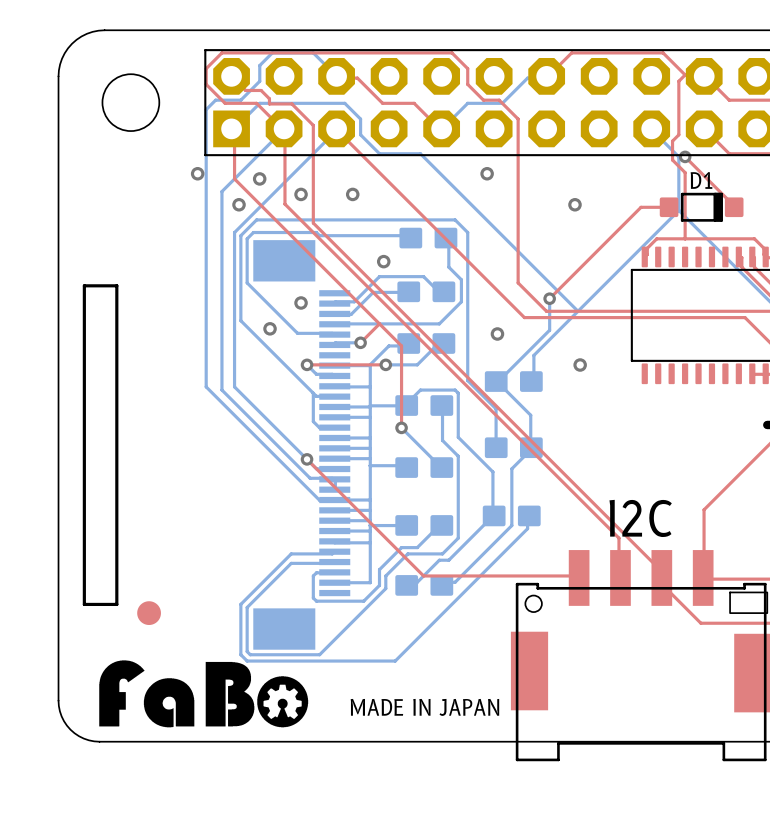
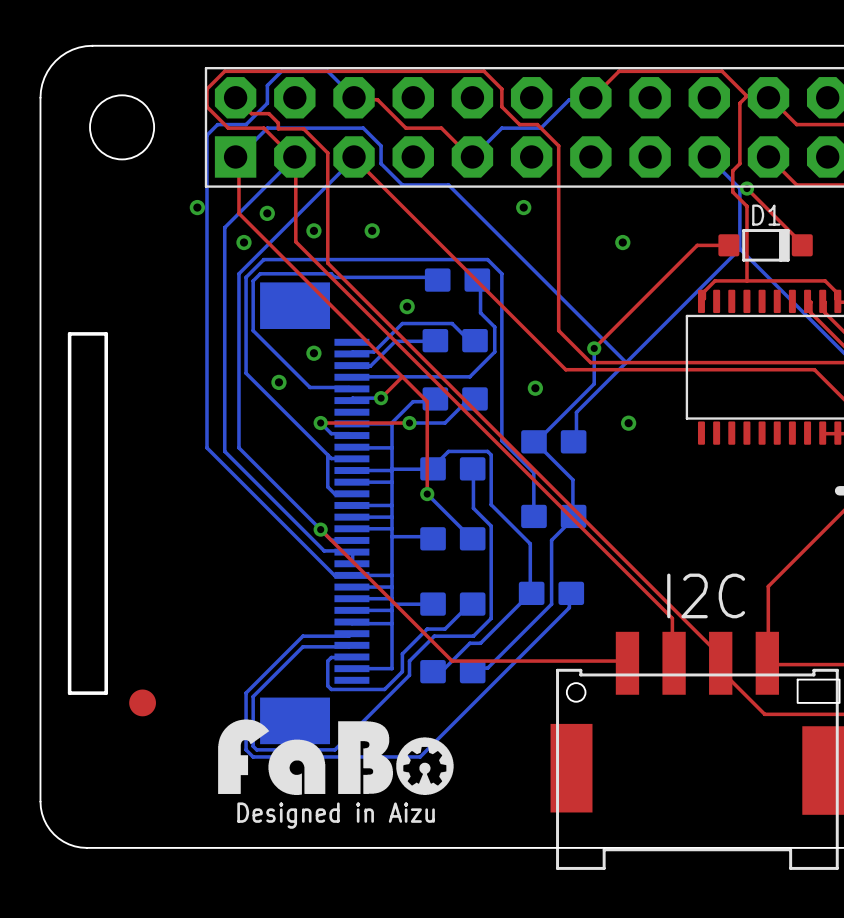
drawing position: (203, 693) -> (335, 757)
text: MADE IN JAPAN (424, 707) -> none
text: none -> Designed in Aizu (336, 815)

